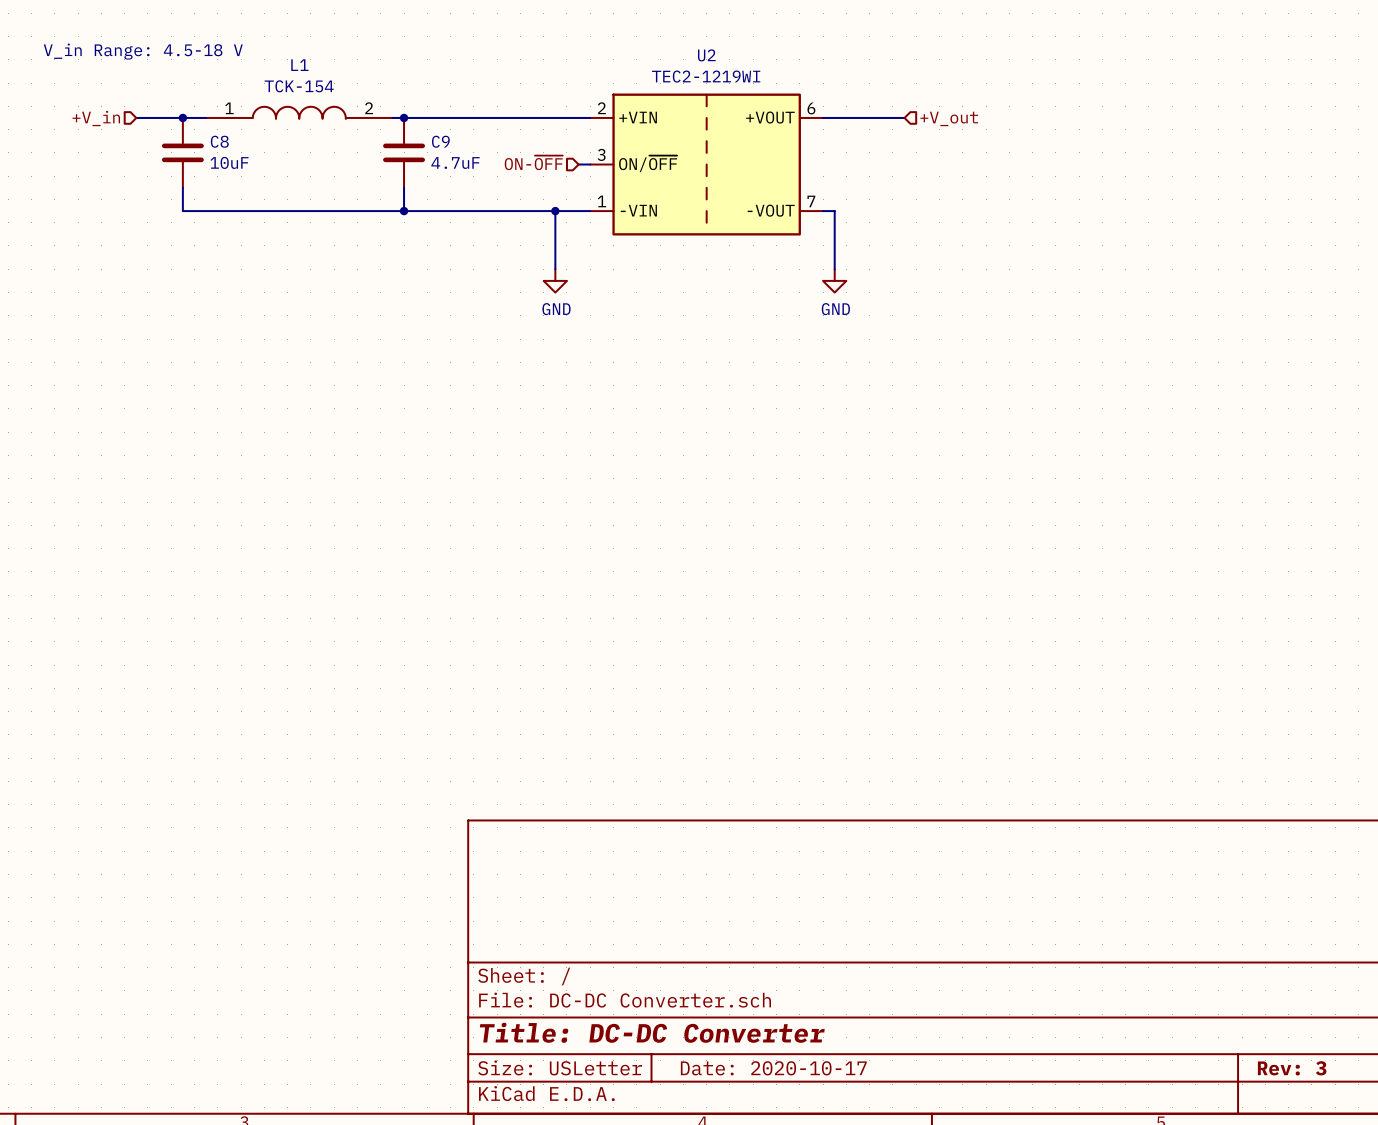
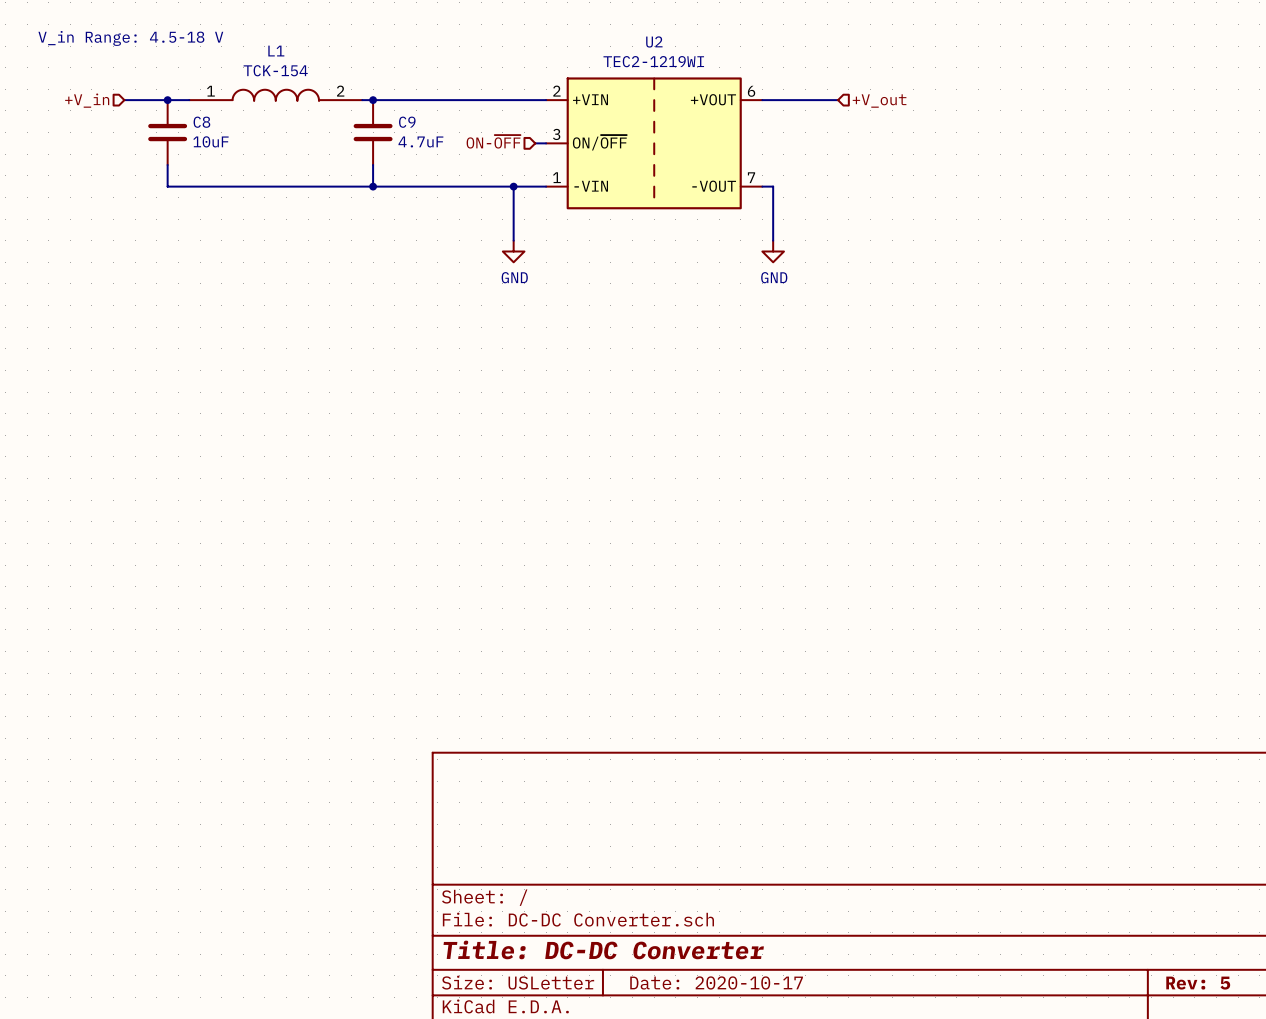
title block: Rev: 3 (1292, 1068) -> Rev: 5 (1198, 983)

